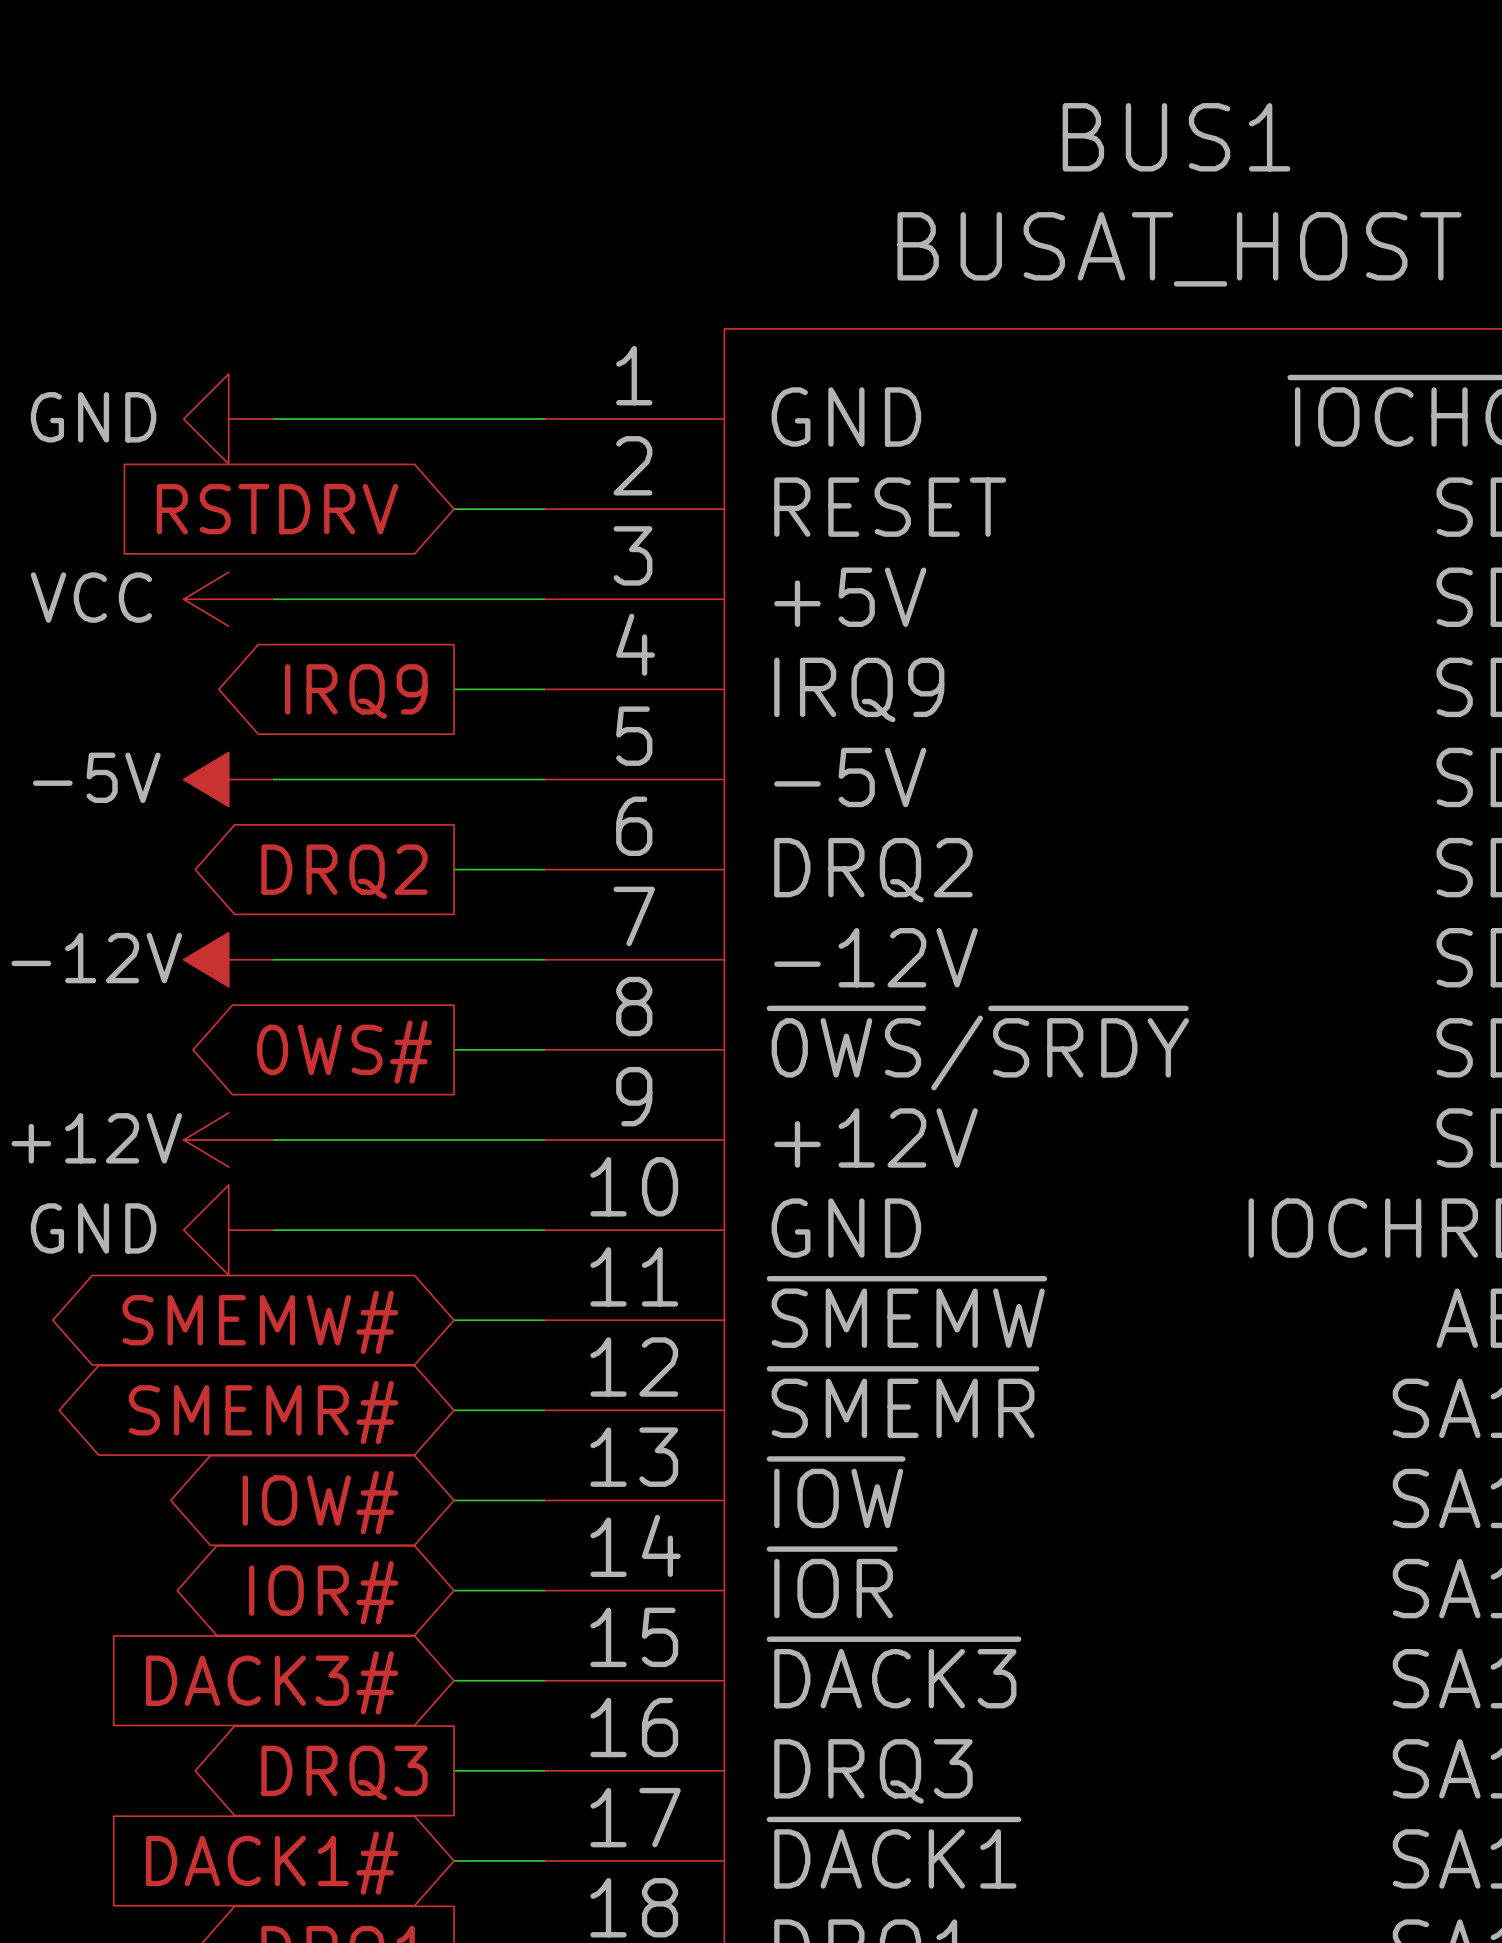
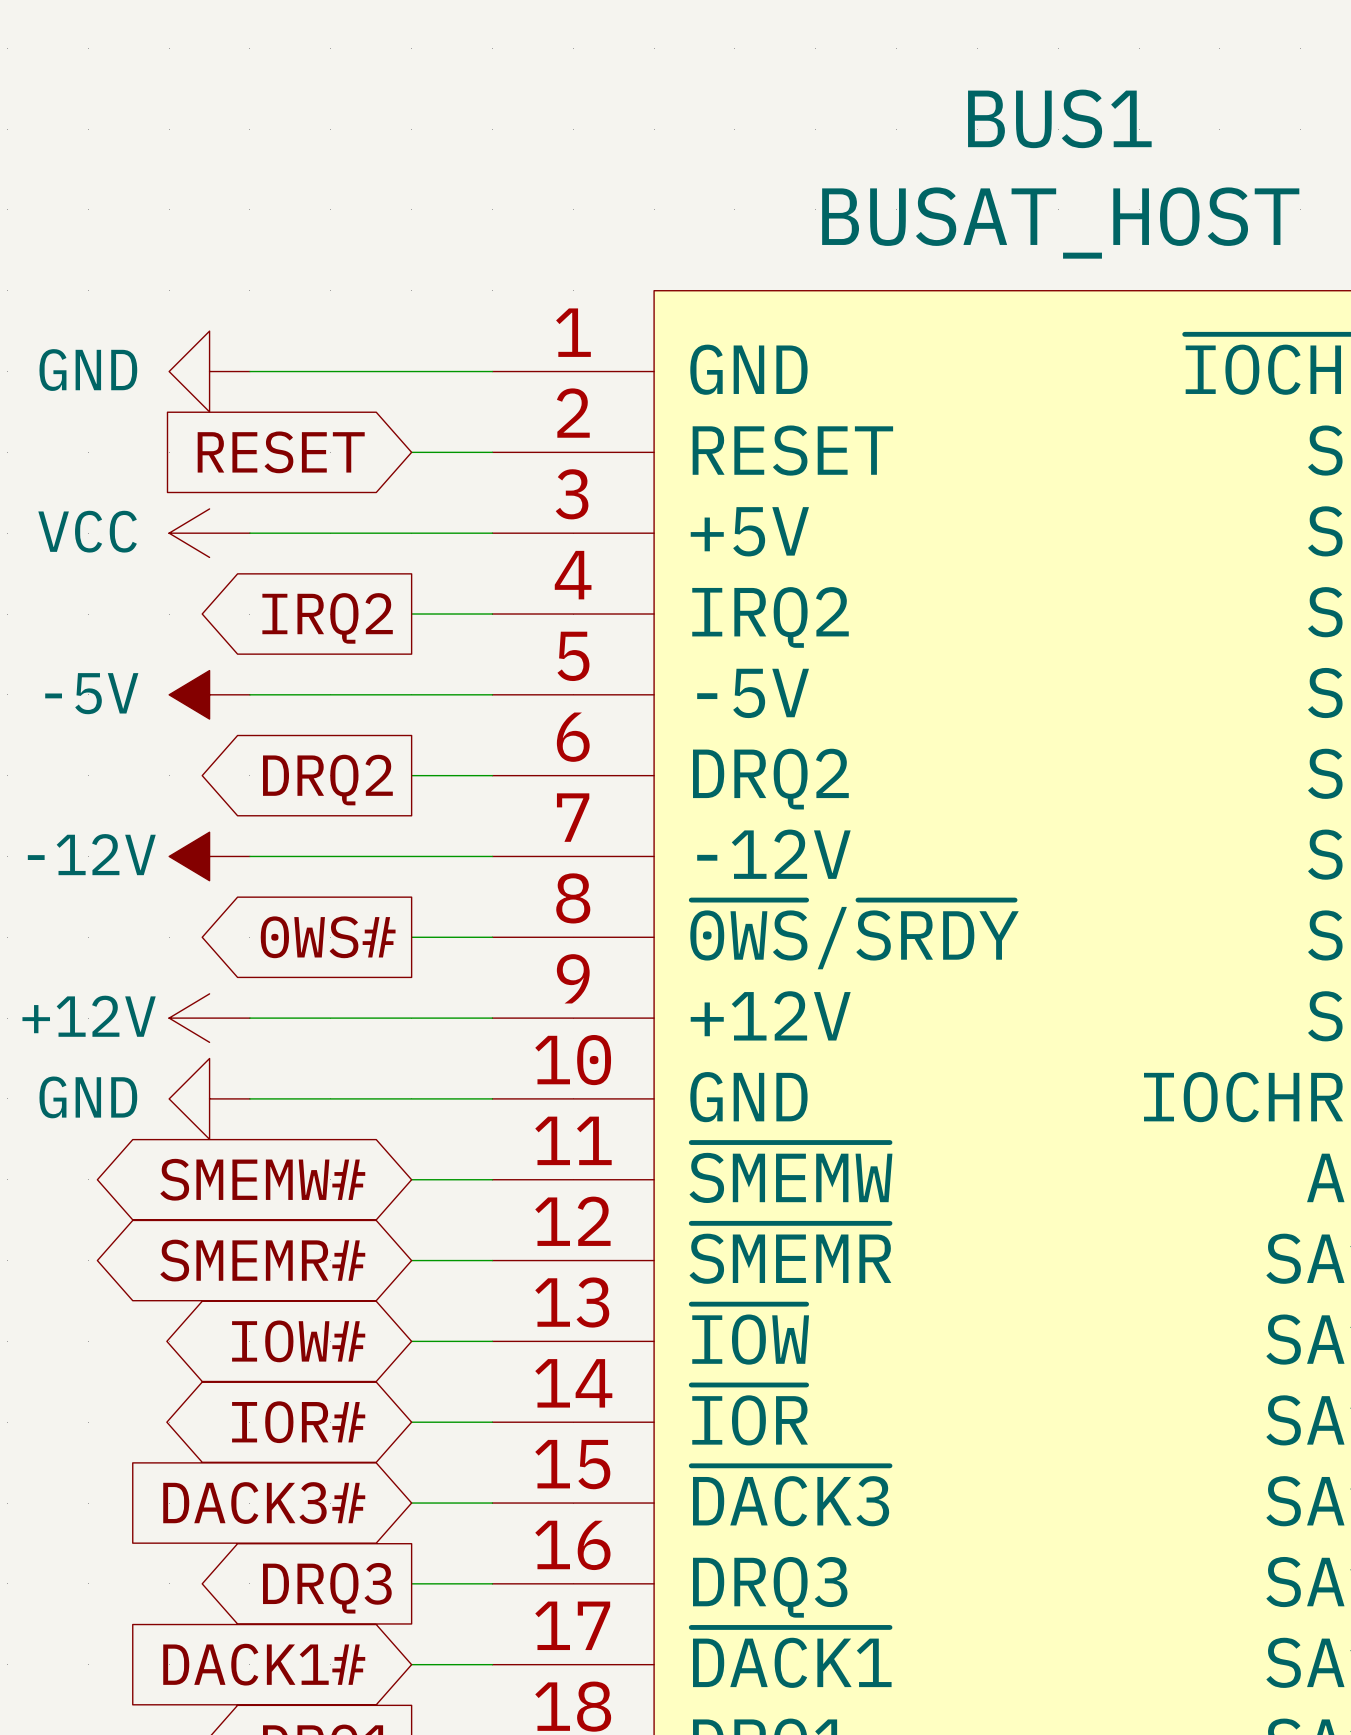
global label: RSTDRV (277, 509) -> RESET (281, 452)
BUS1 pin name: IRQ9 (859, 689) -> IRQ2 (770, 617)
global label: IRQ9 (356, 691) -> IRQ2 (327, 618)

